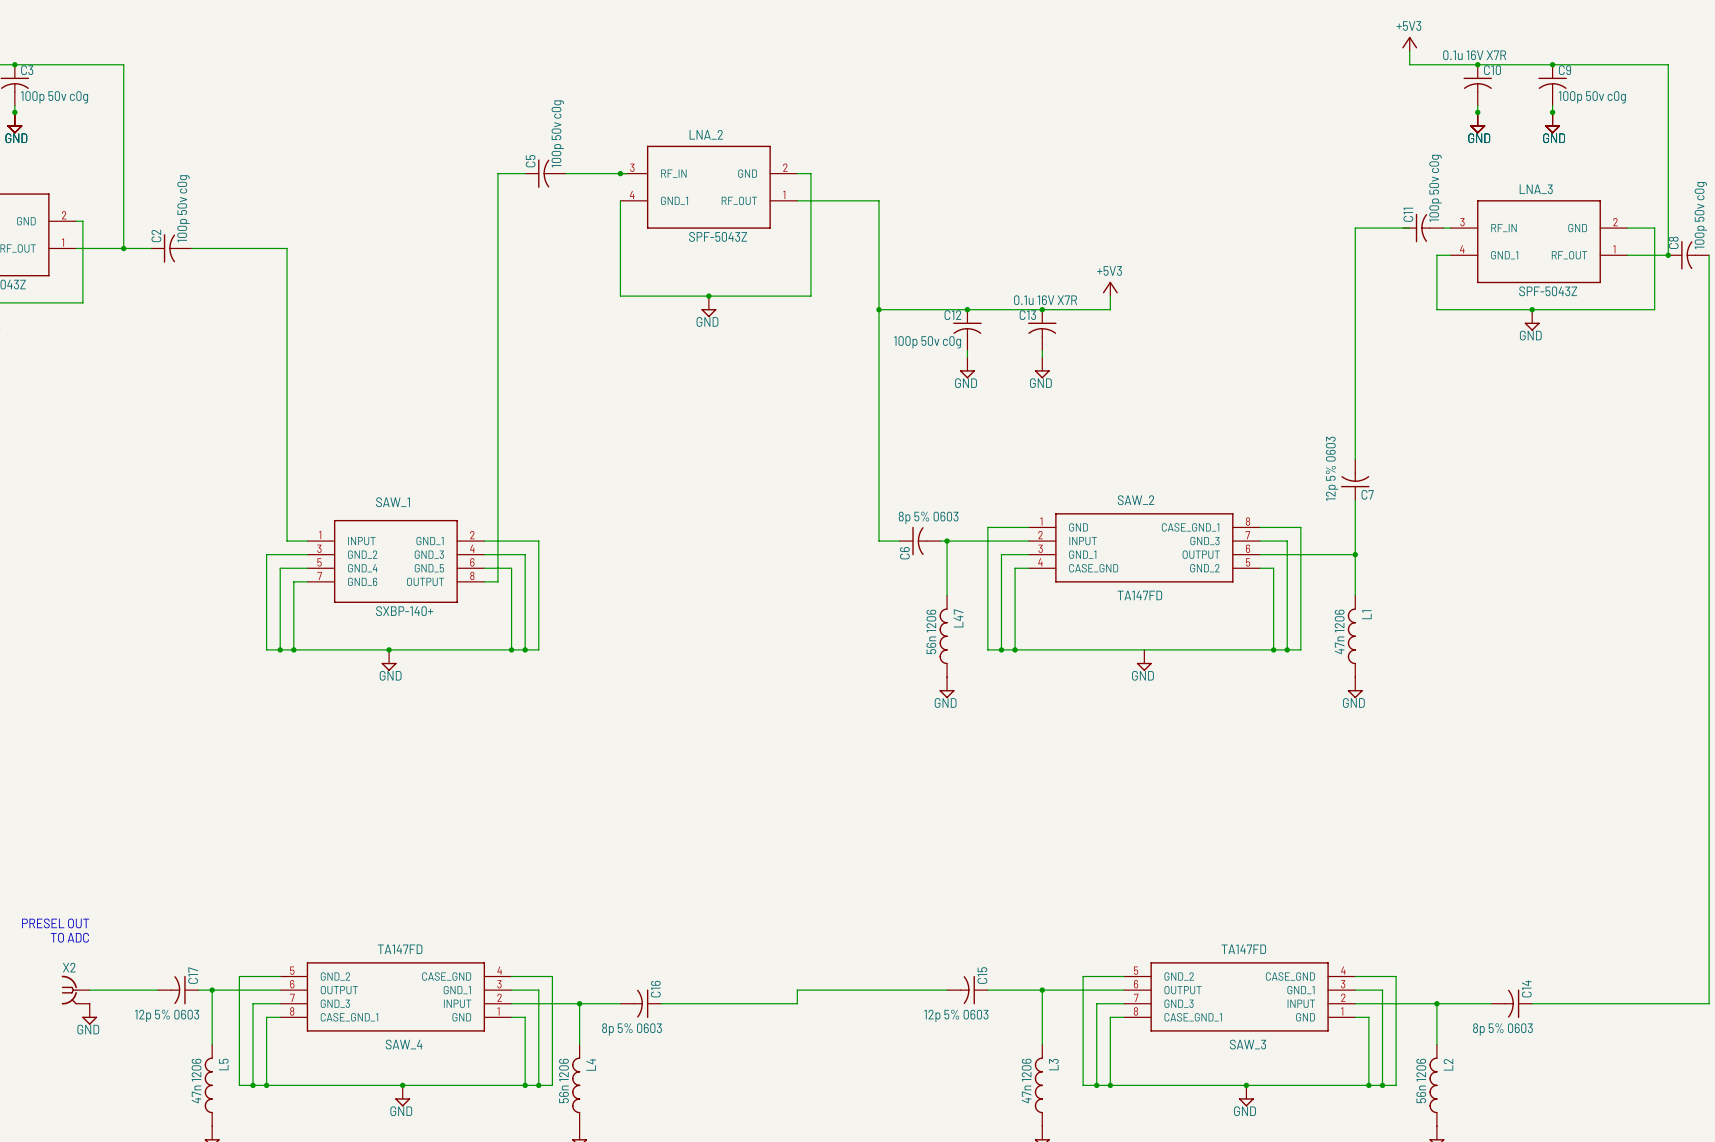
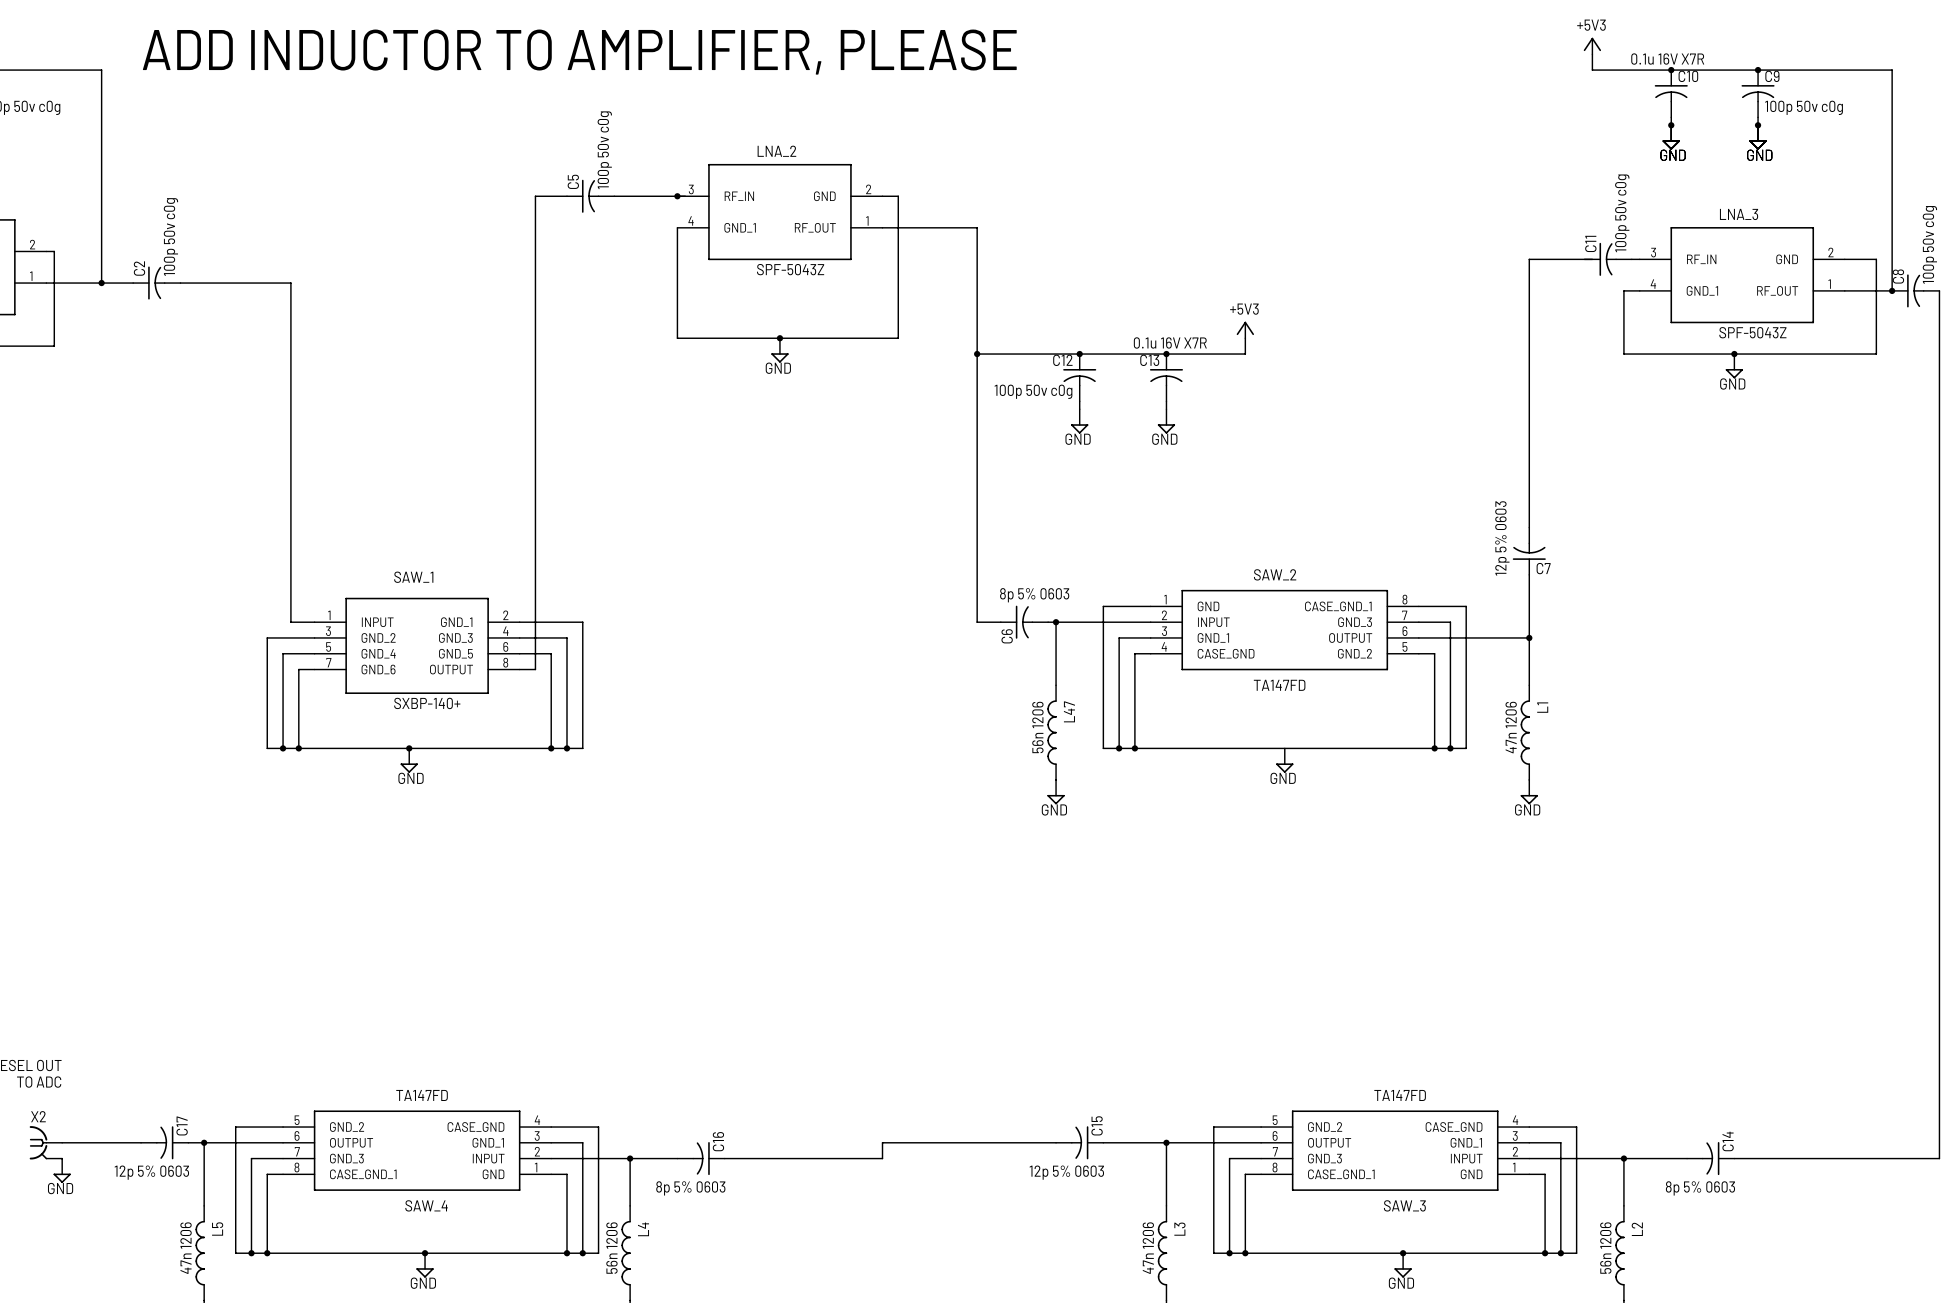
text: none -> ADD INDUCTOR TO AMPLIFIER, PLEASE (579, 52)

